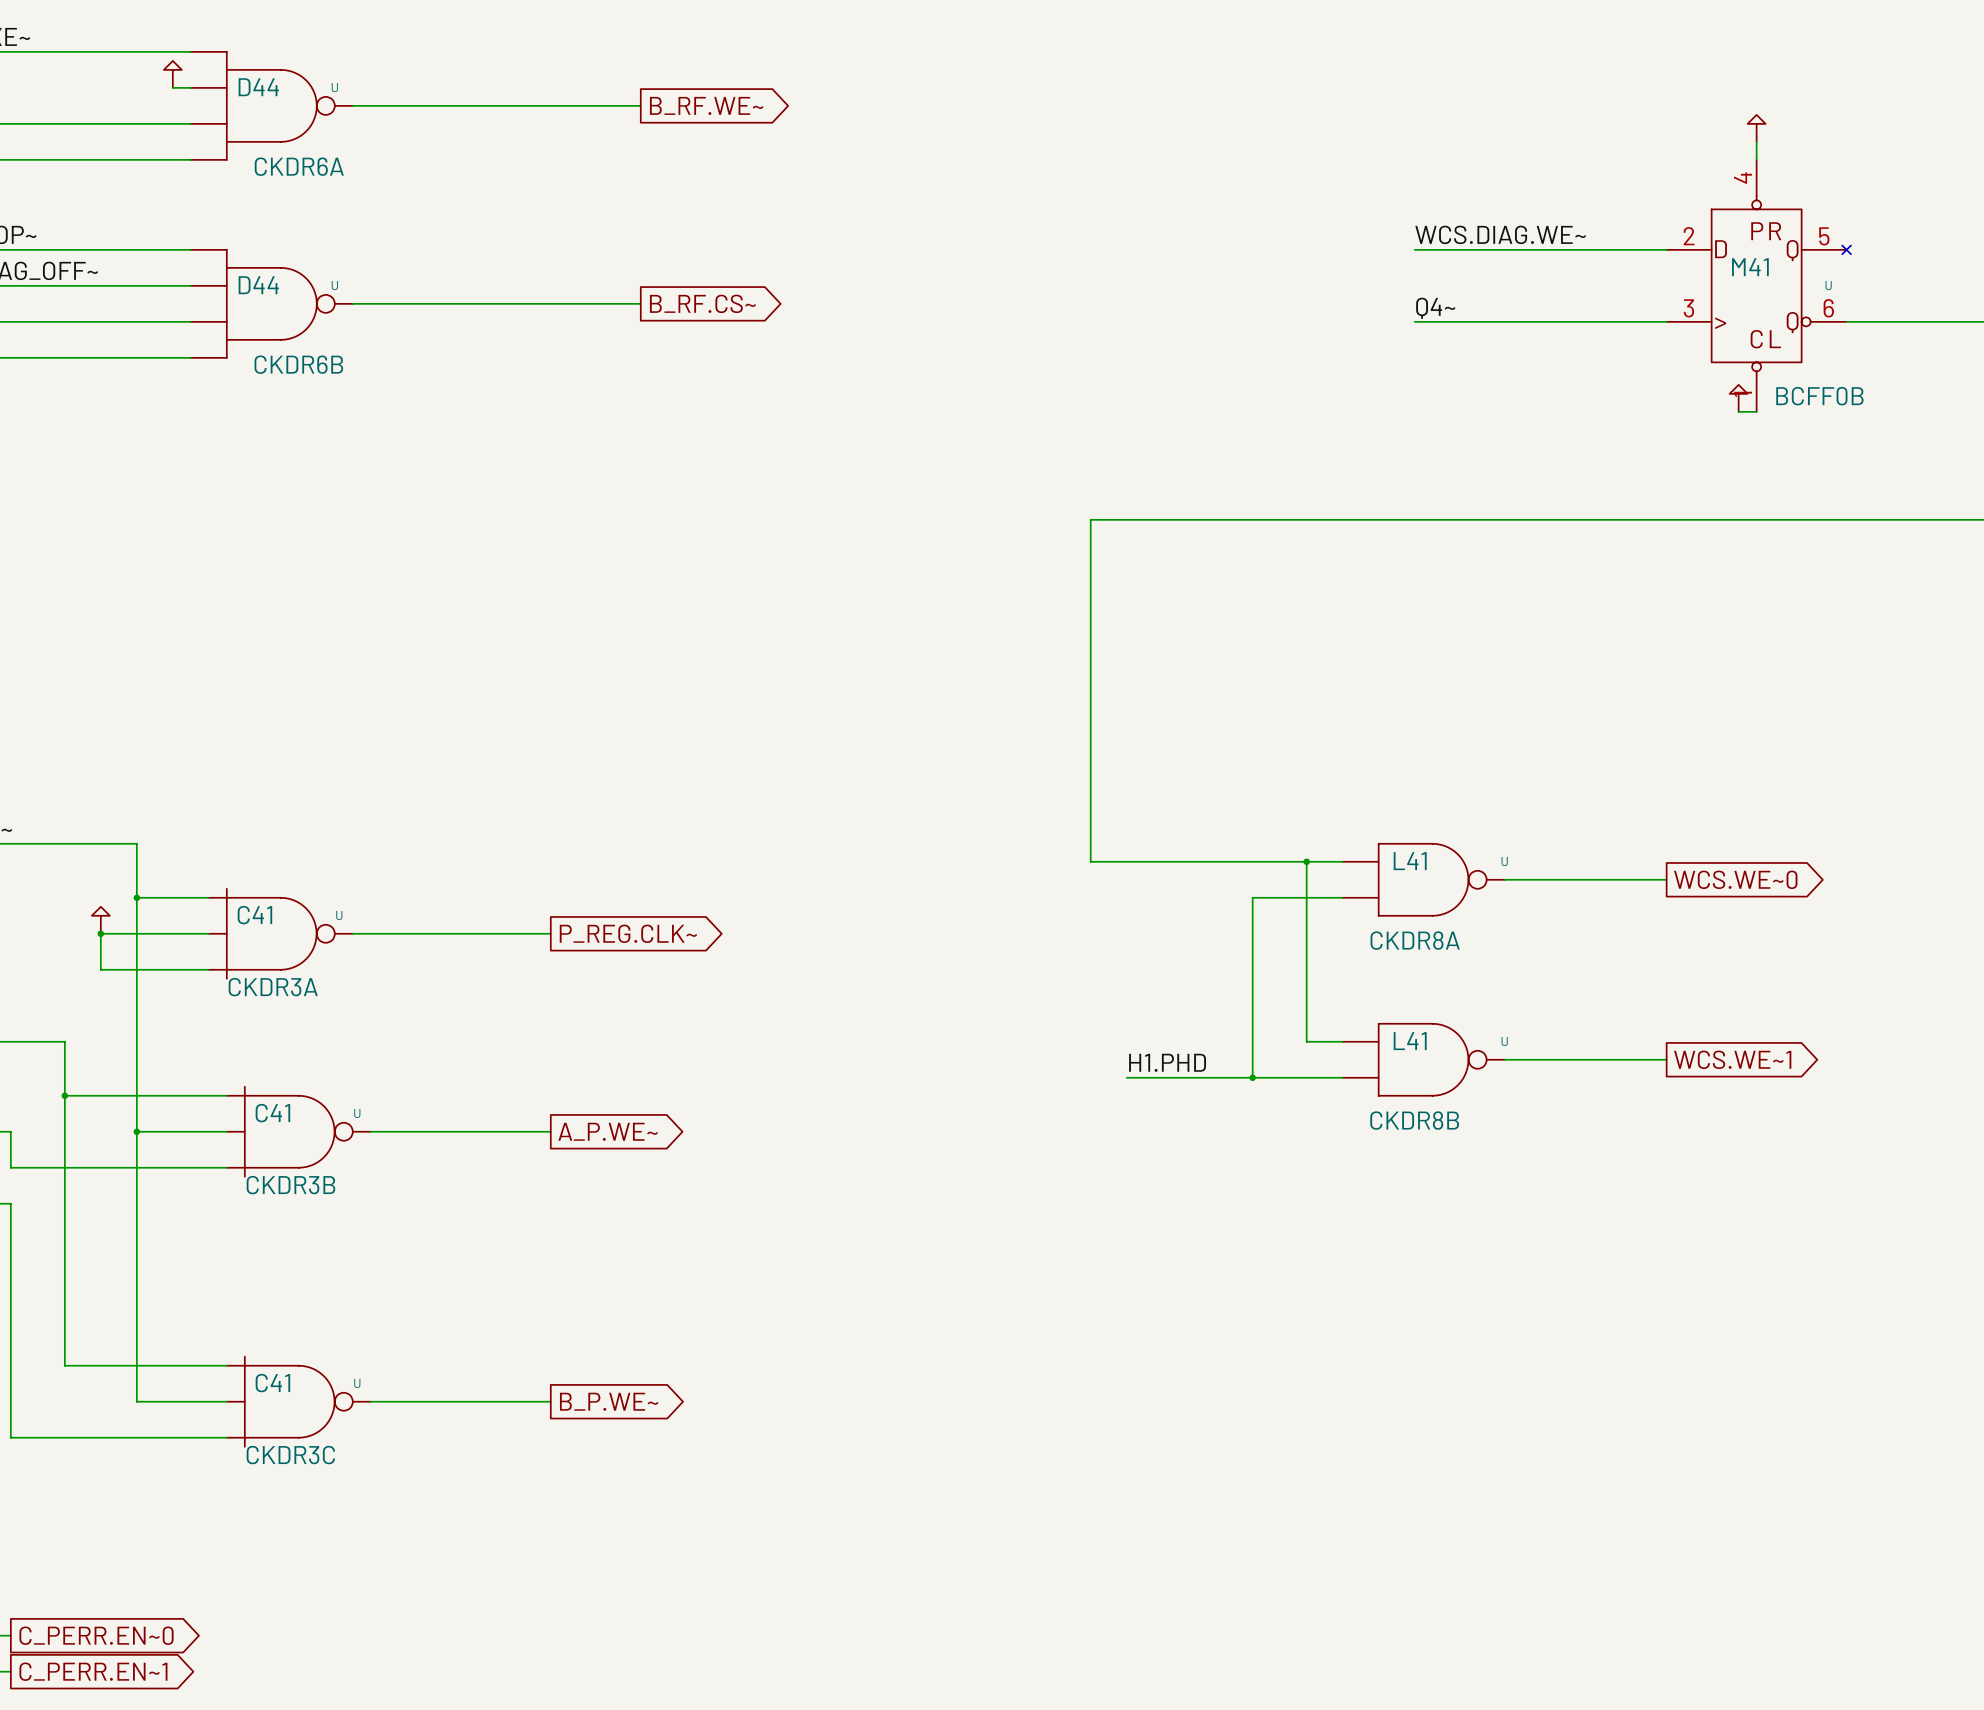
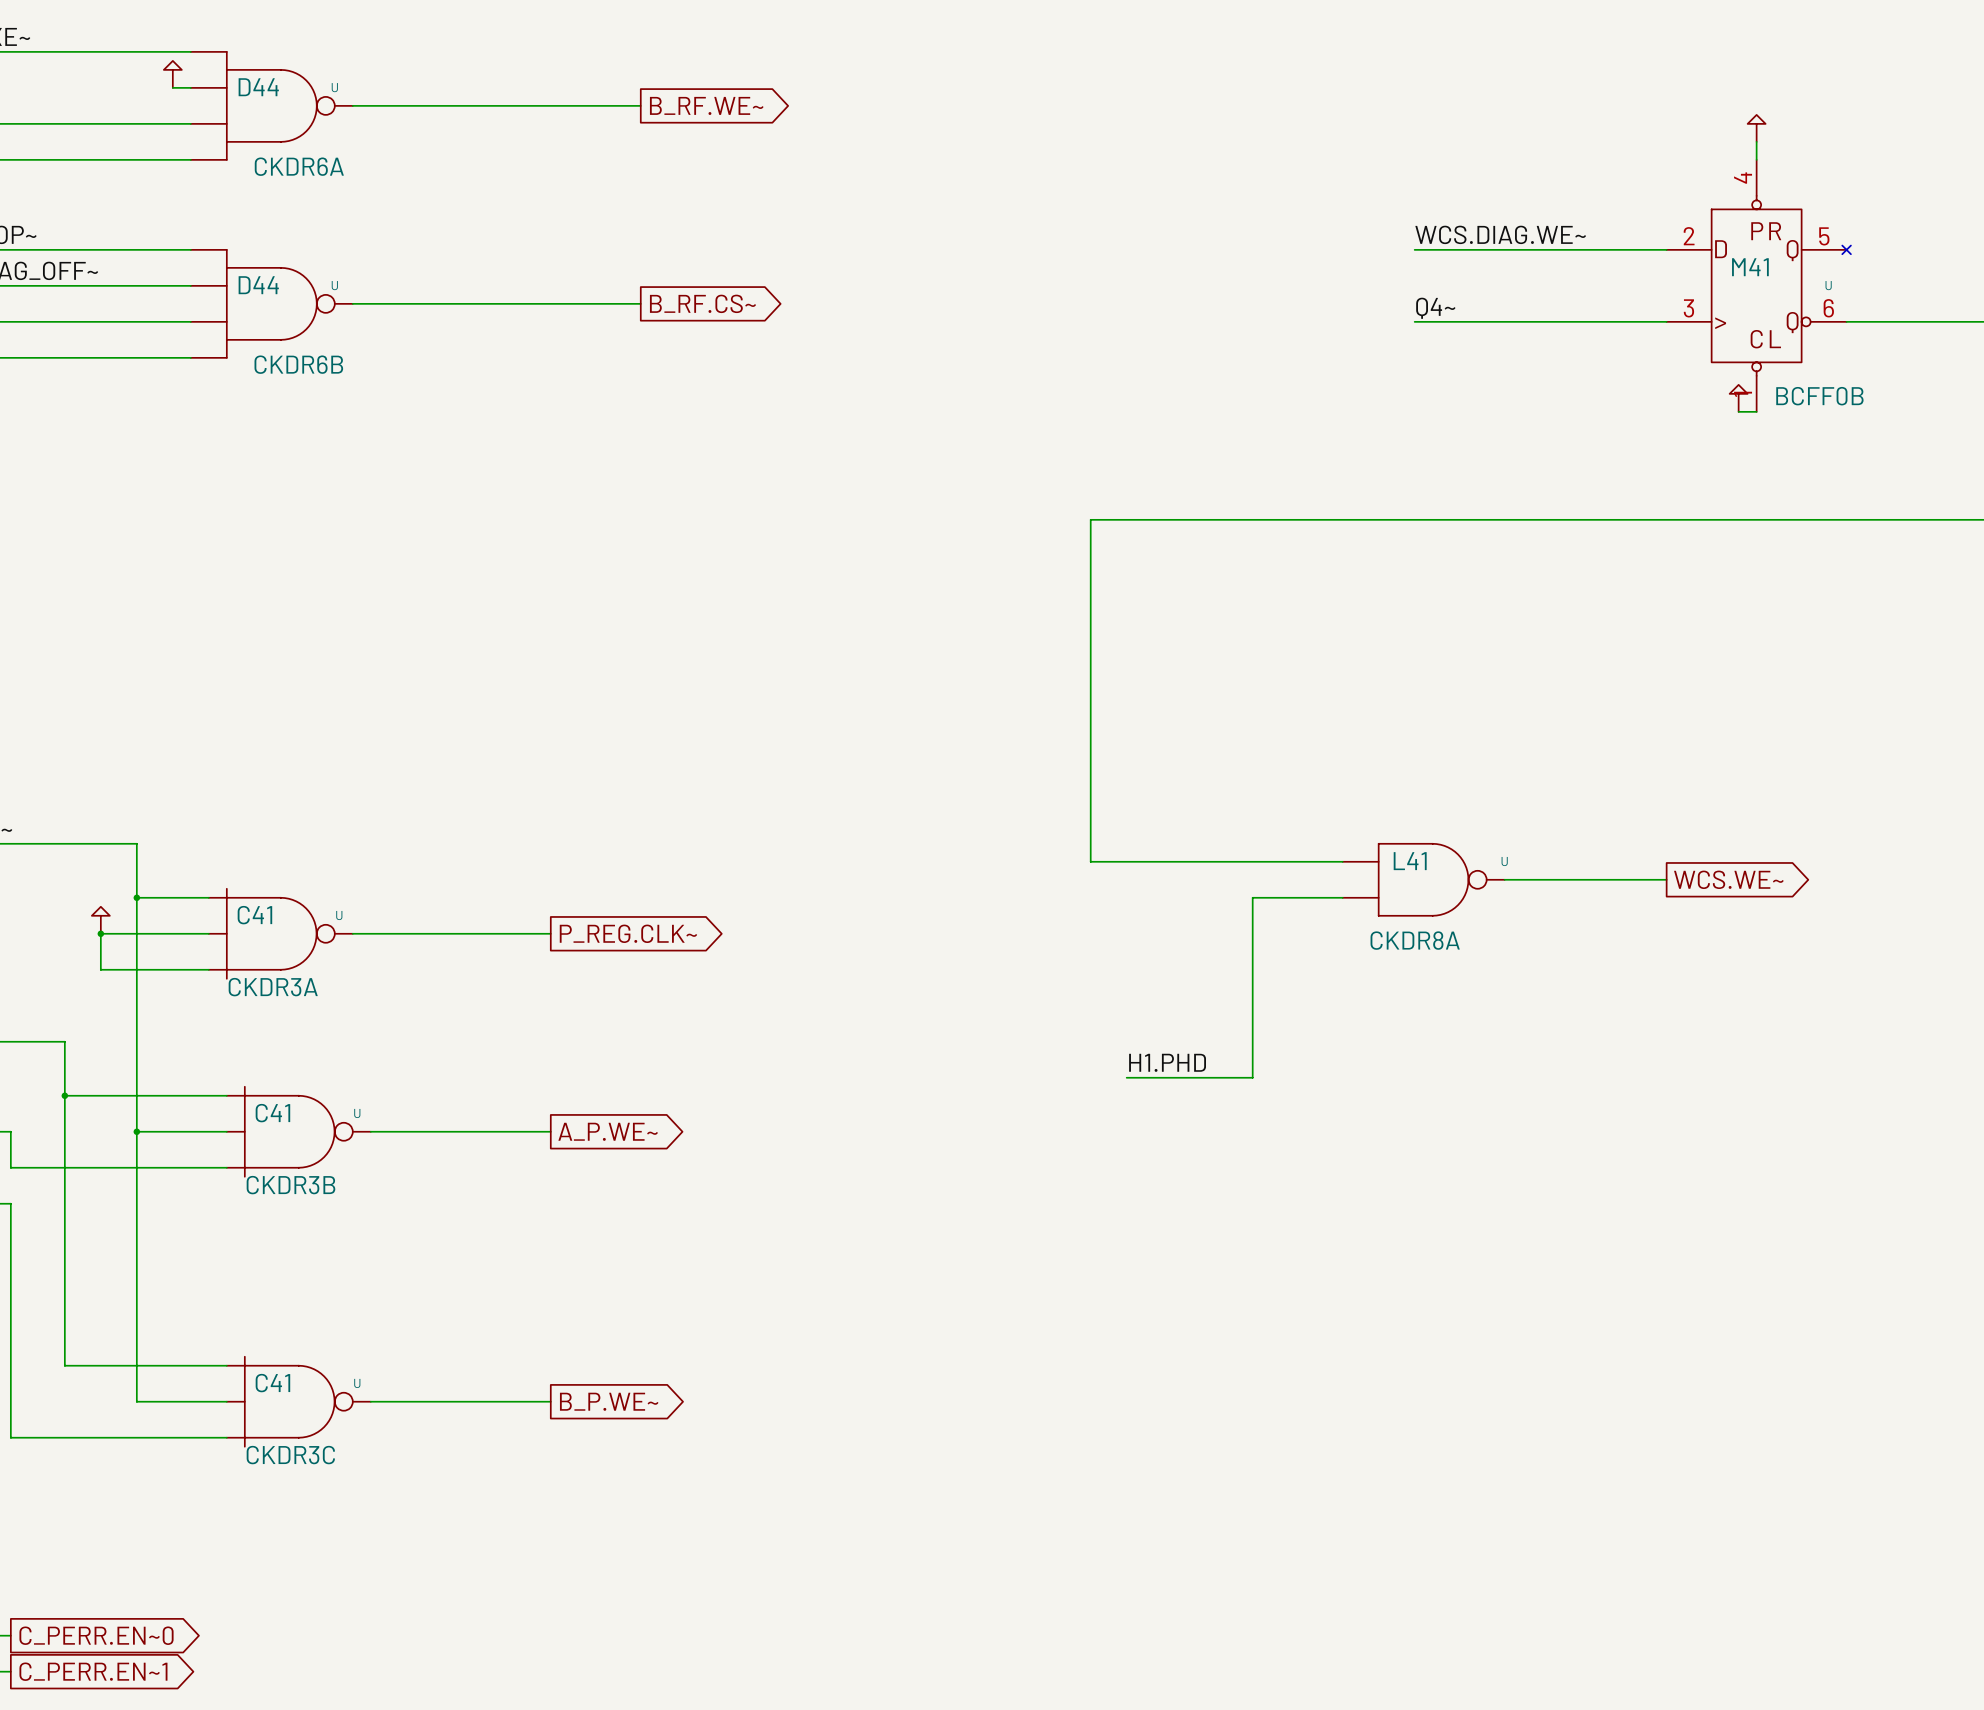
wire: (1306, 861) (1306, 1041) (1342, 1041) -> none
junction: (1306, 861) -> none
global label: WCS.WE~0 (1735, 879) -> WCS.WE~ (1728, 879)
U: (1423, 1059) -> none
wire: (1504, 1059) (1666, 1059) -> none
global label: WCS.WE~1 (1732, 1059) -> none
wire: (1252, 1077) (1342, 1077) -> none
junction: (1252, 1077) -> none

